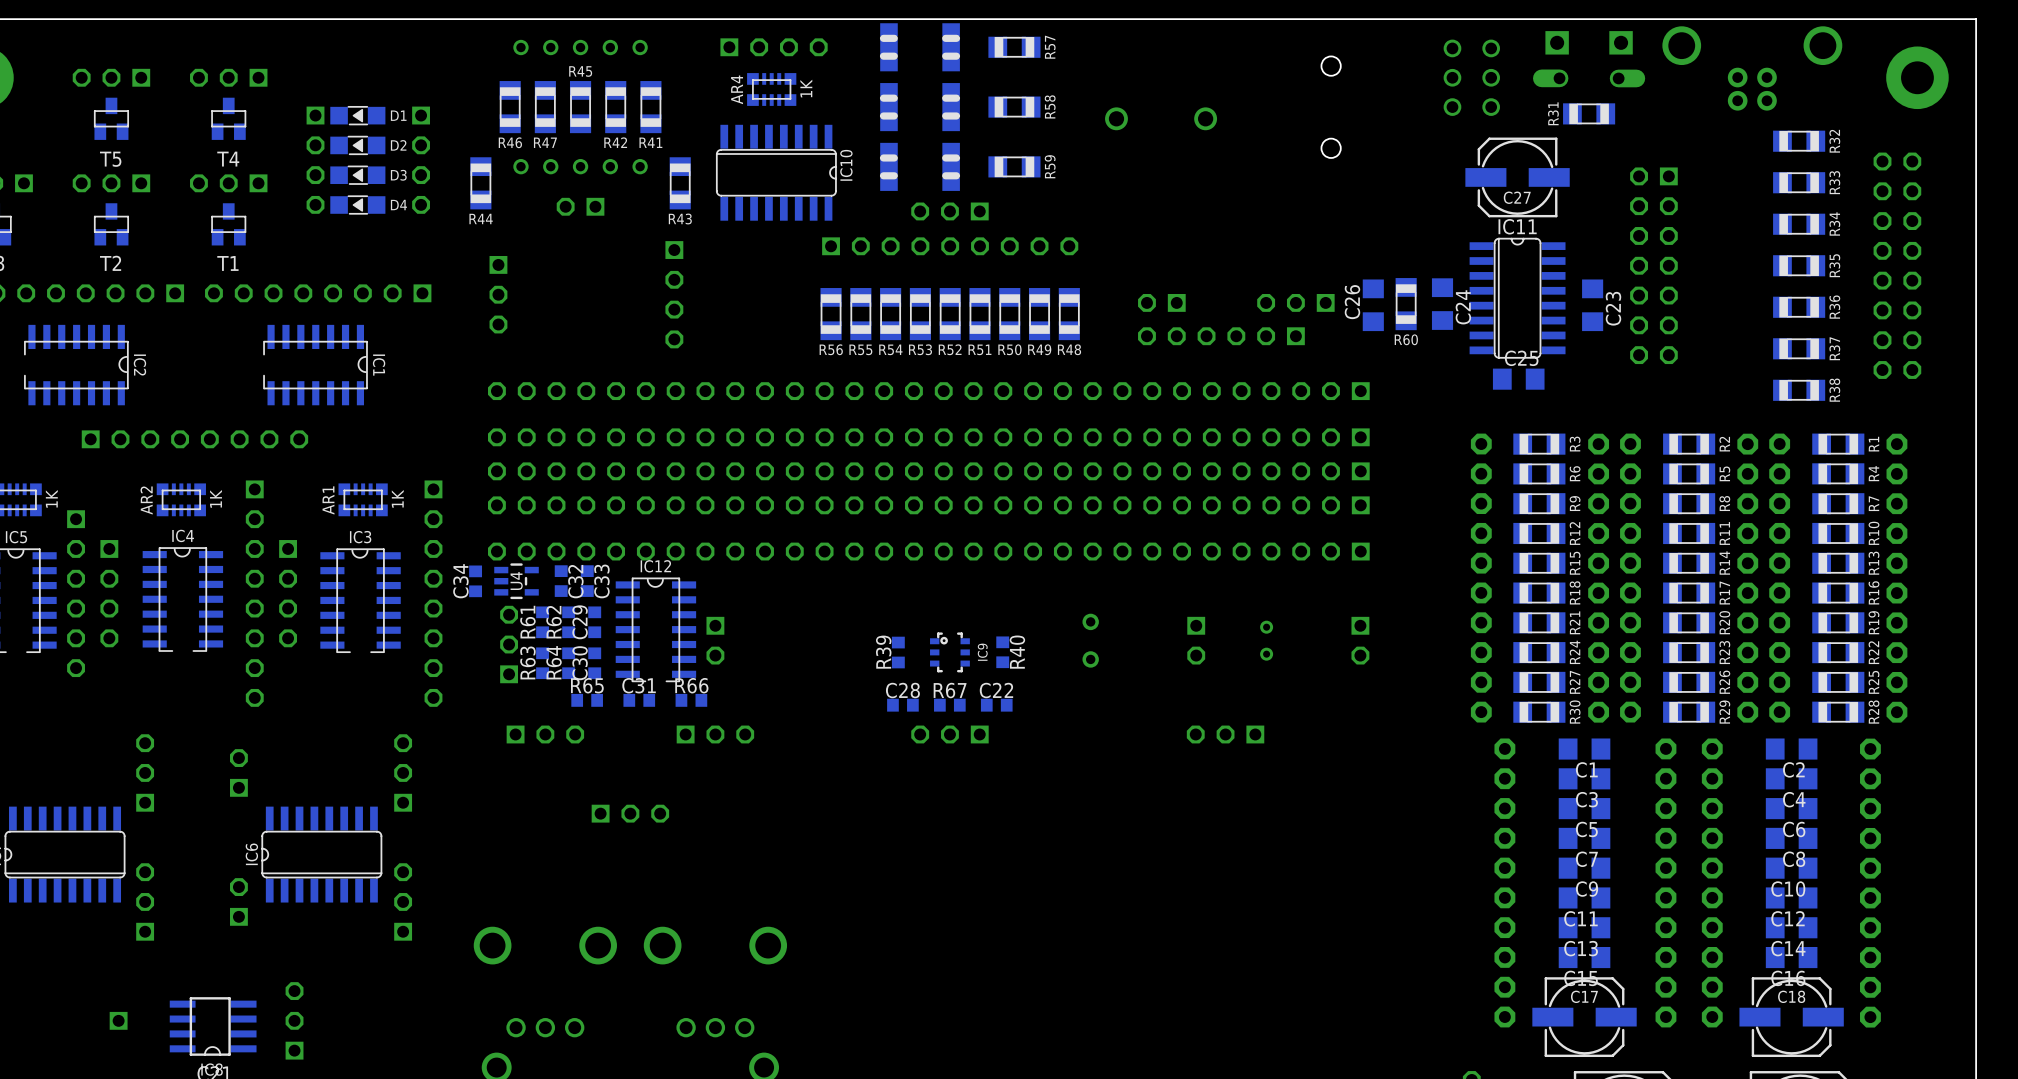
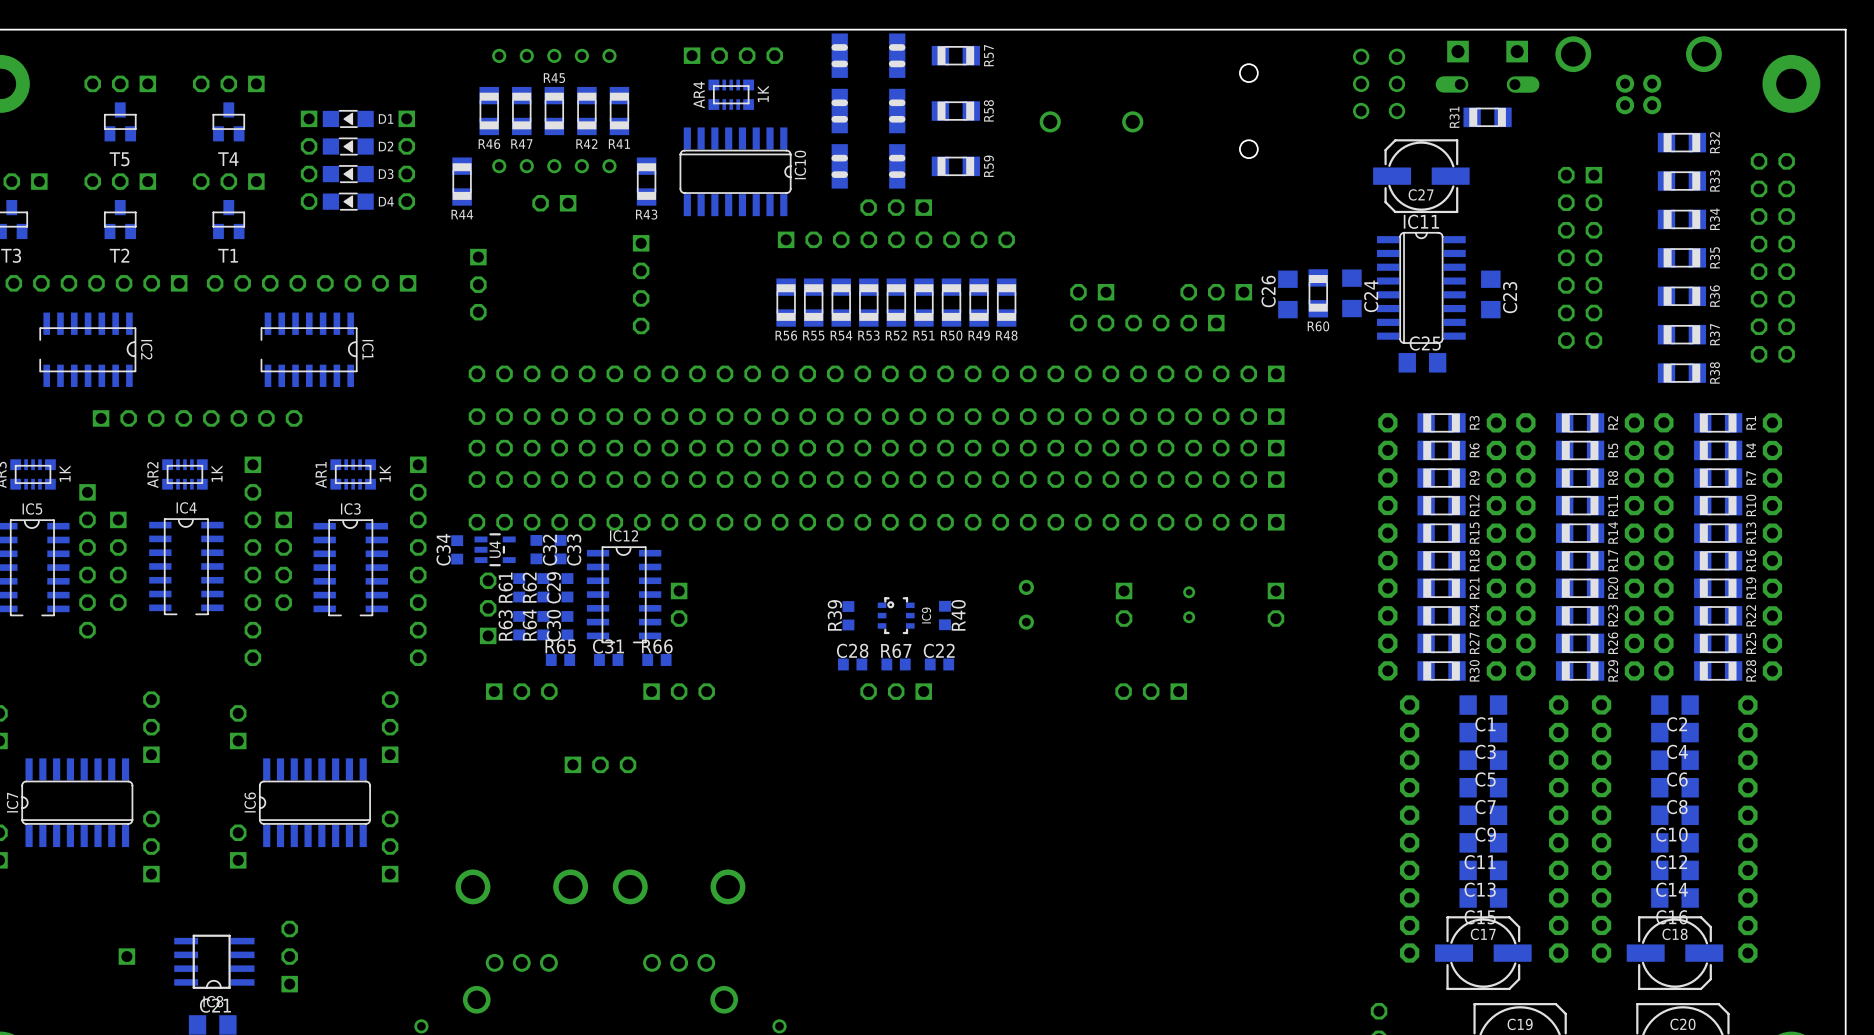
part position: (1653, 265) -> (1580, 257)

